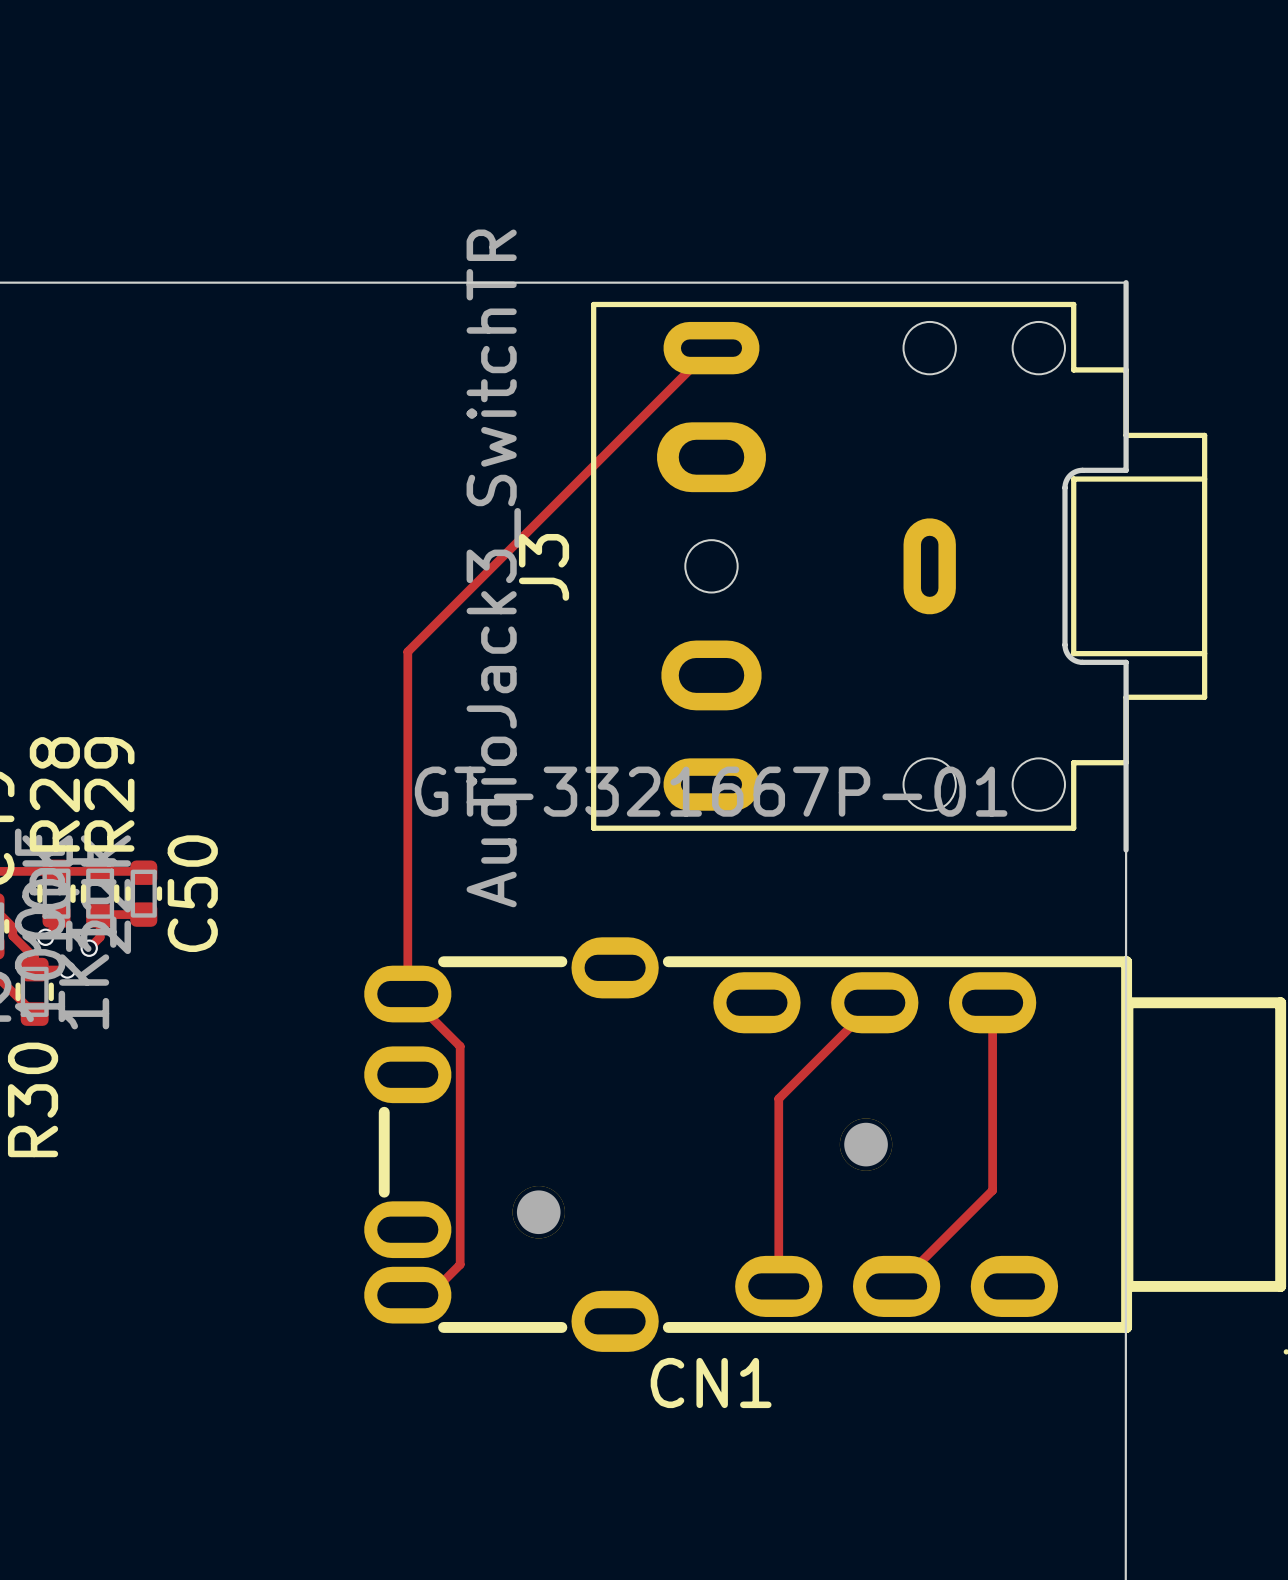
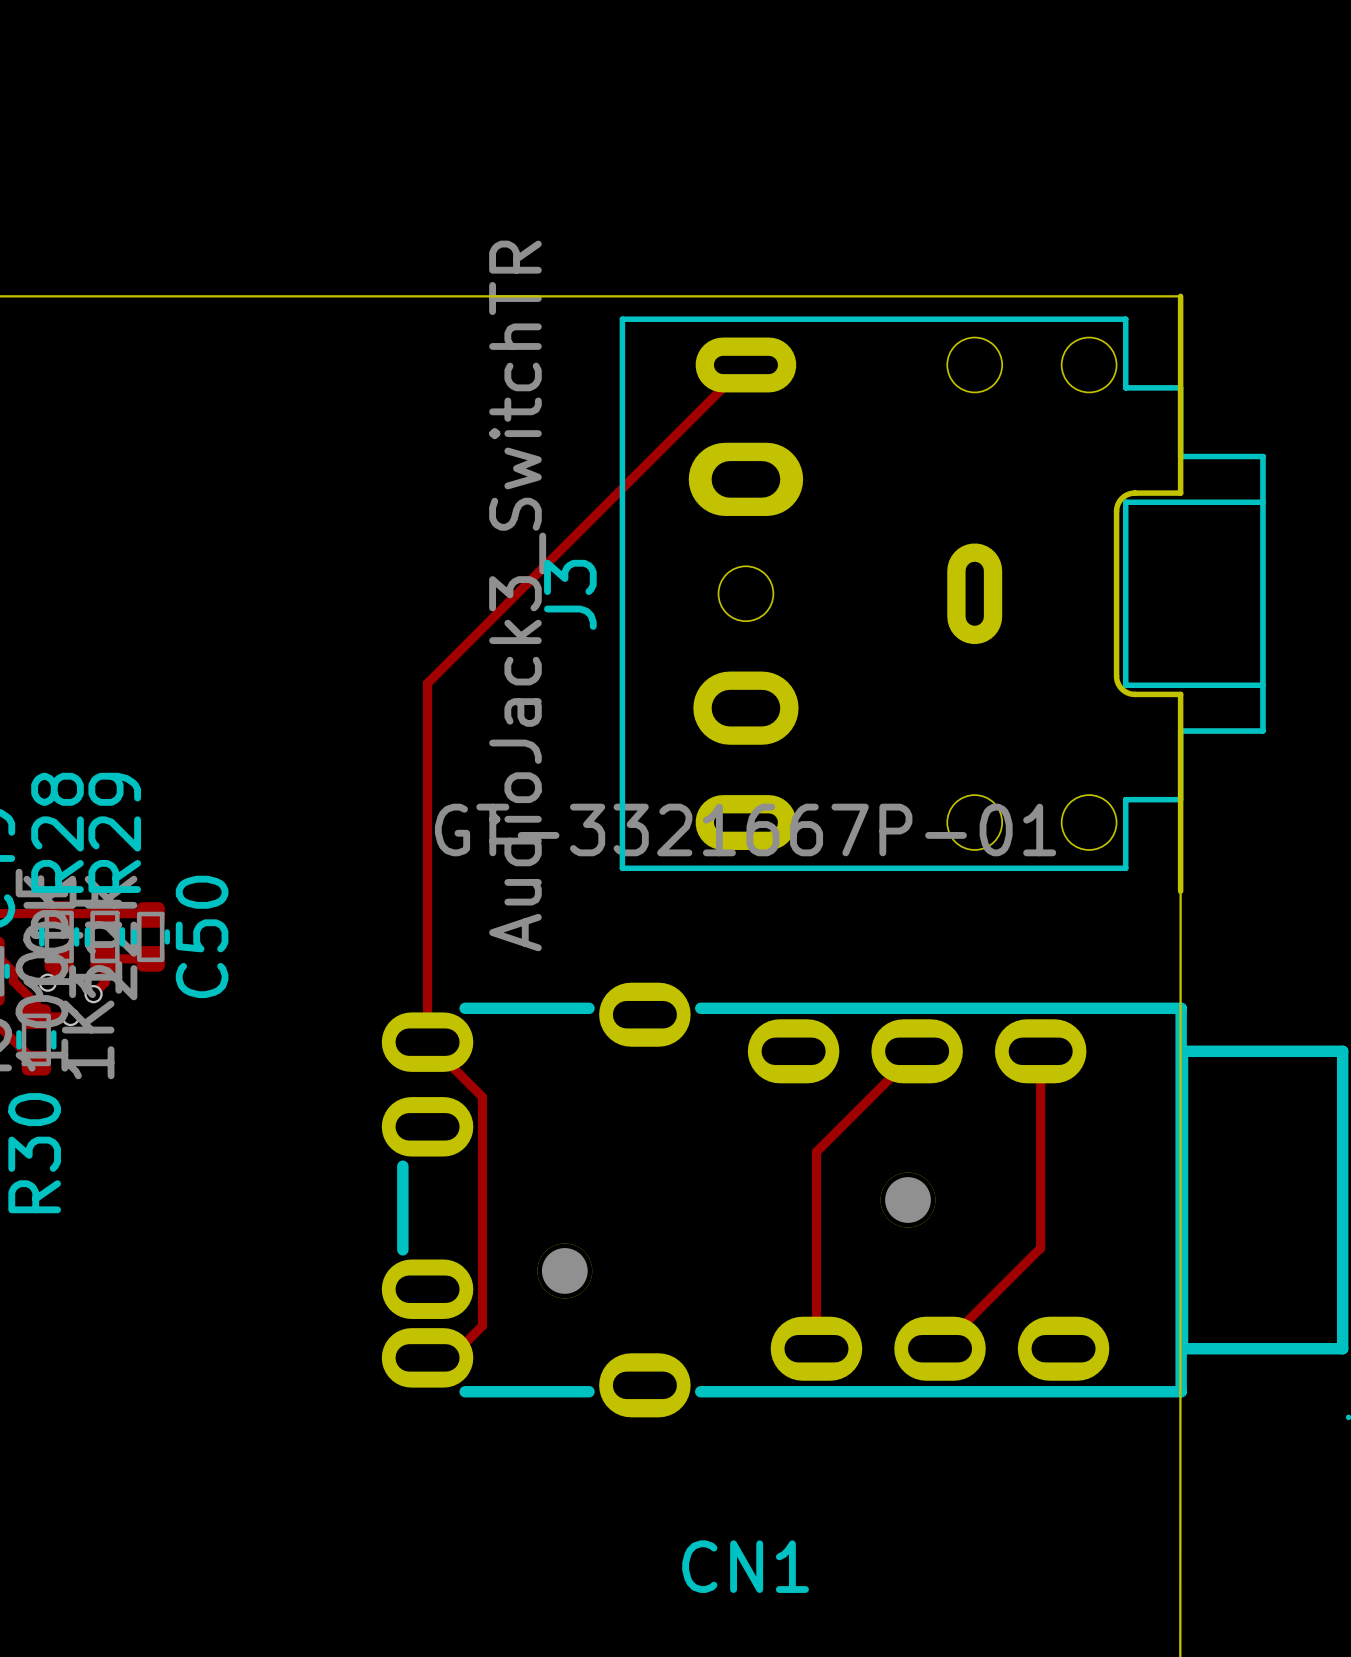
CN1 name position: CN1 (711, 1382) -> CN1 (745, 1566)

